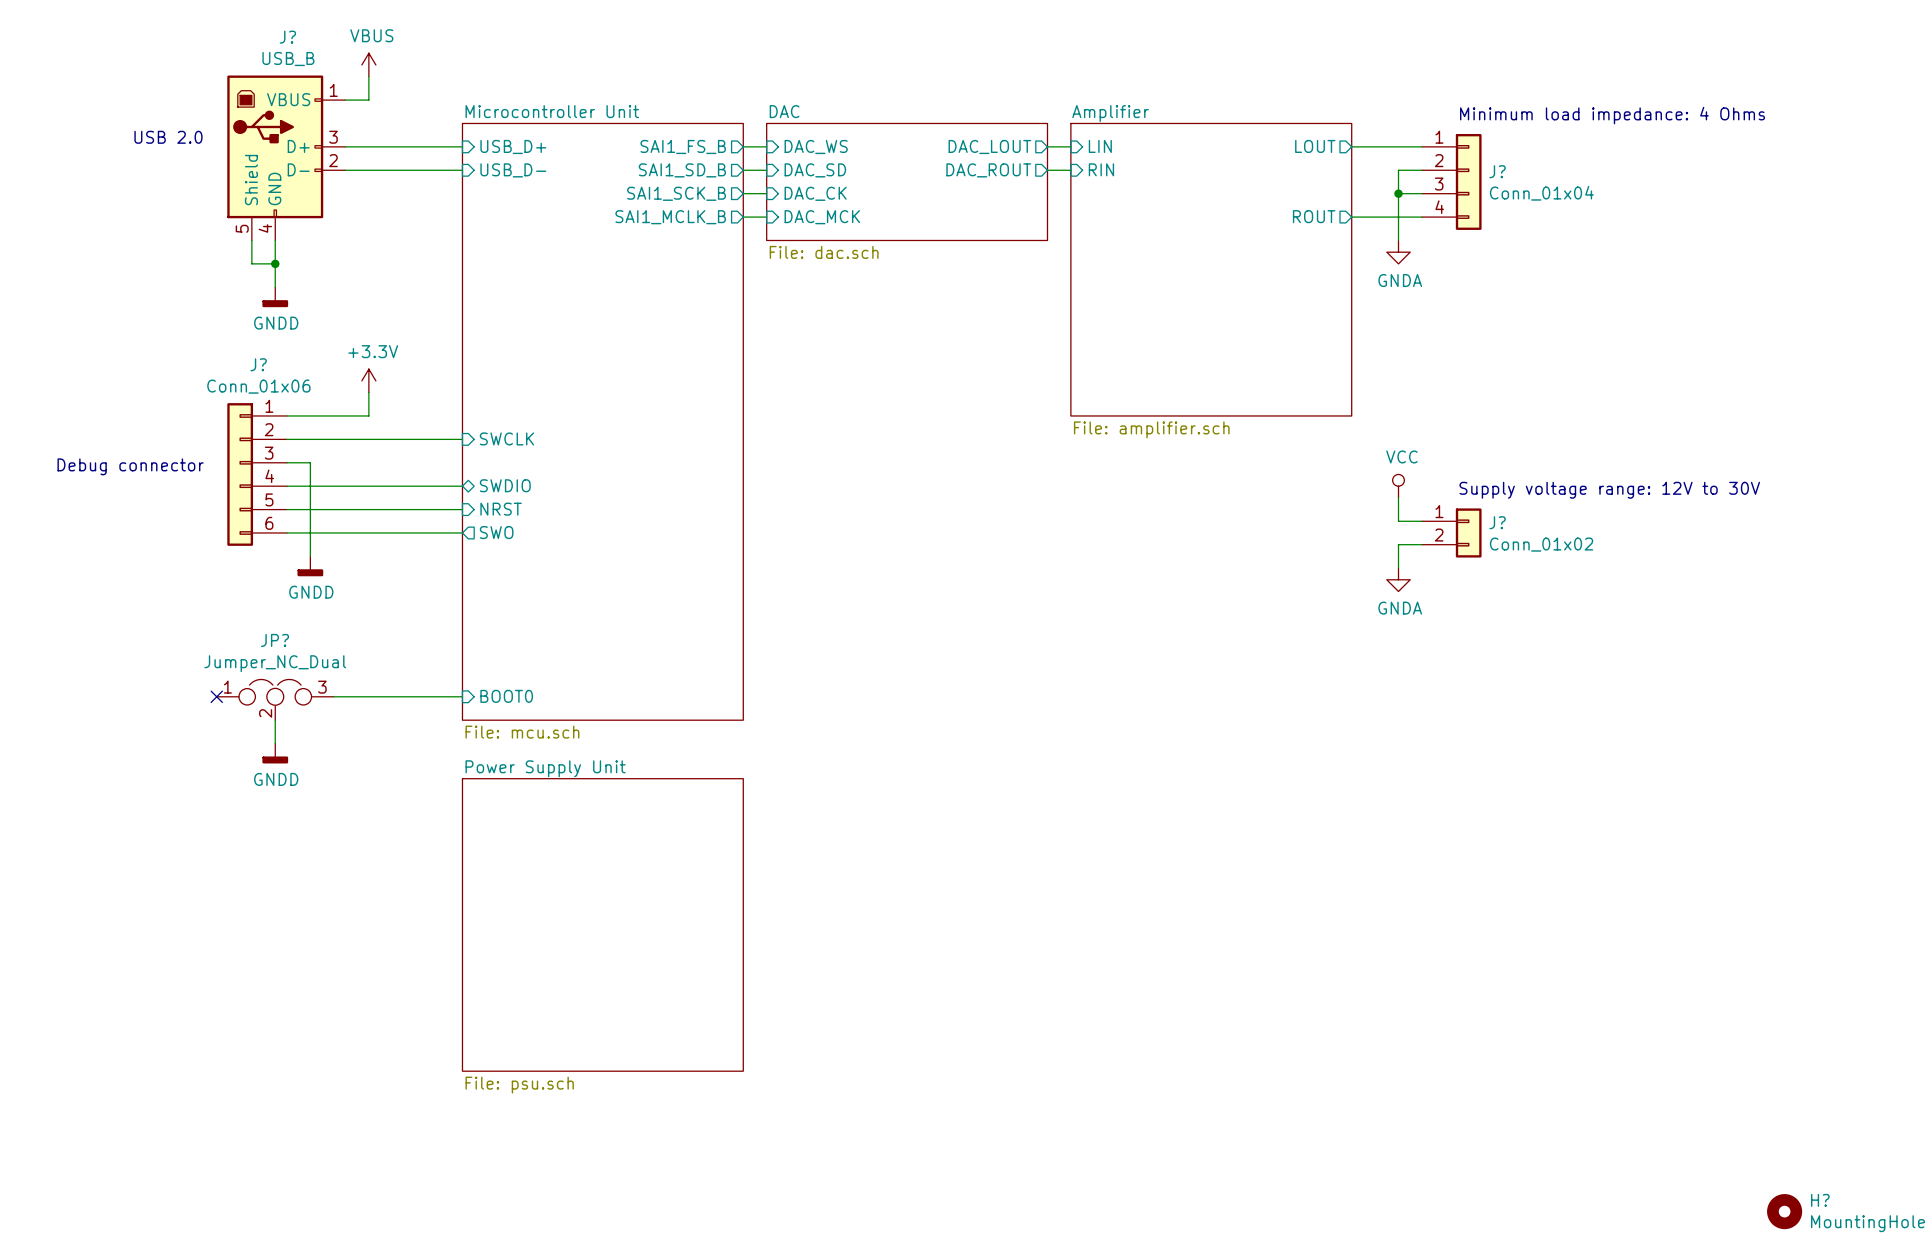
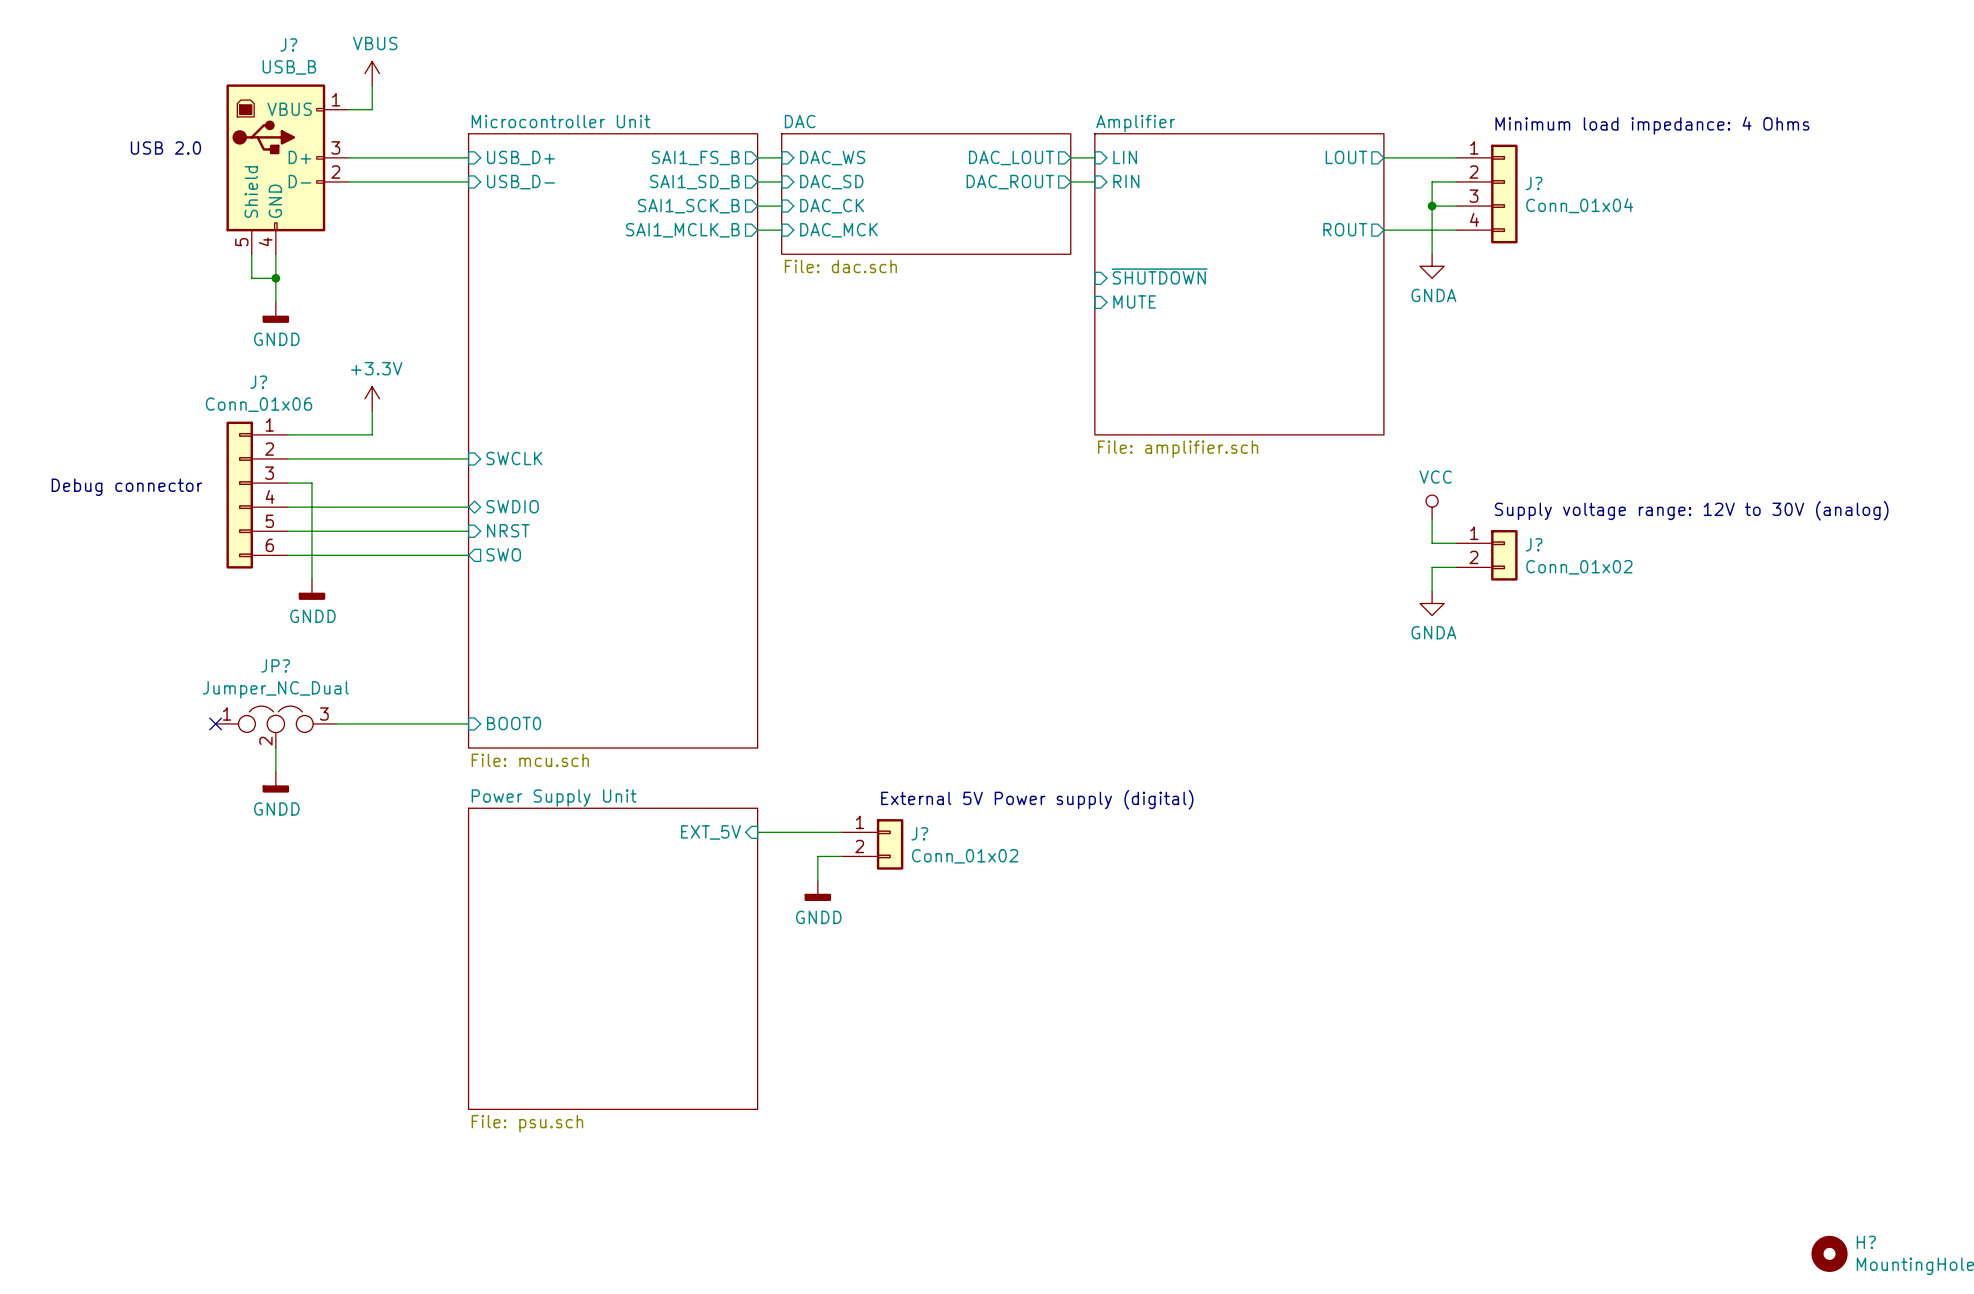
sheet pin: none -> ~{SHUTDOWN} (1159, 276)
sheet pin: none -> MUTE (1134, 301)
text: Supply voltage range: 12V to 30V (1609, 490) -> Supply voltage range: 12V to 30V (analog) (1691, 510)
text: none -> External 5V Power supply (digital) (1037, 799)
sheet pin: none -> EXT_5V (710, 832)
wire: none -> (757, 832) (841, 832)
J?: none -> Conn_01x02 (872, 844)
wire: none -> (841, 856) (817, 856) (817, 880)
power symbol: none -> GNDD (817, 890)

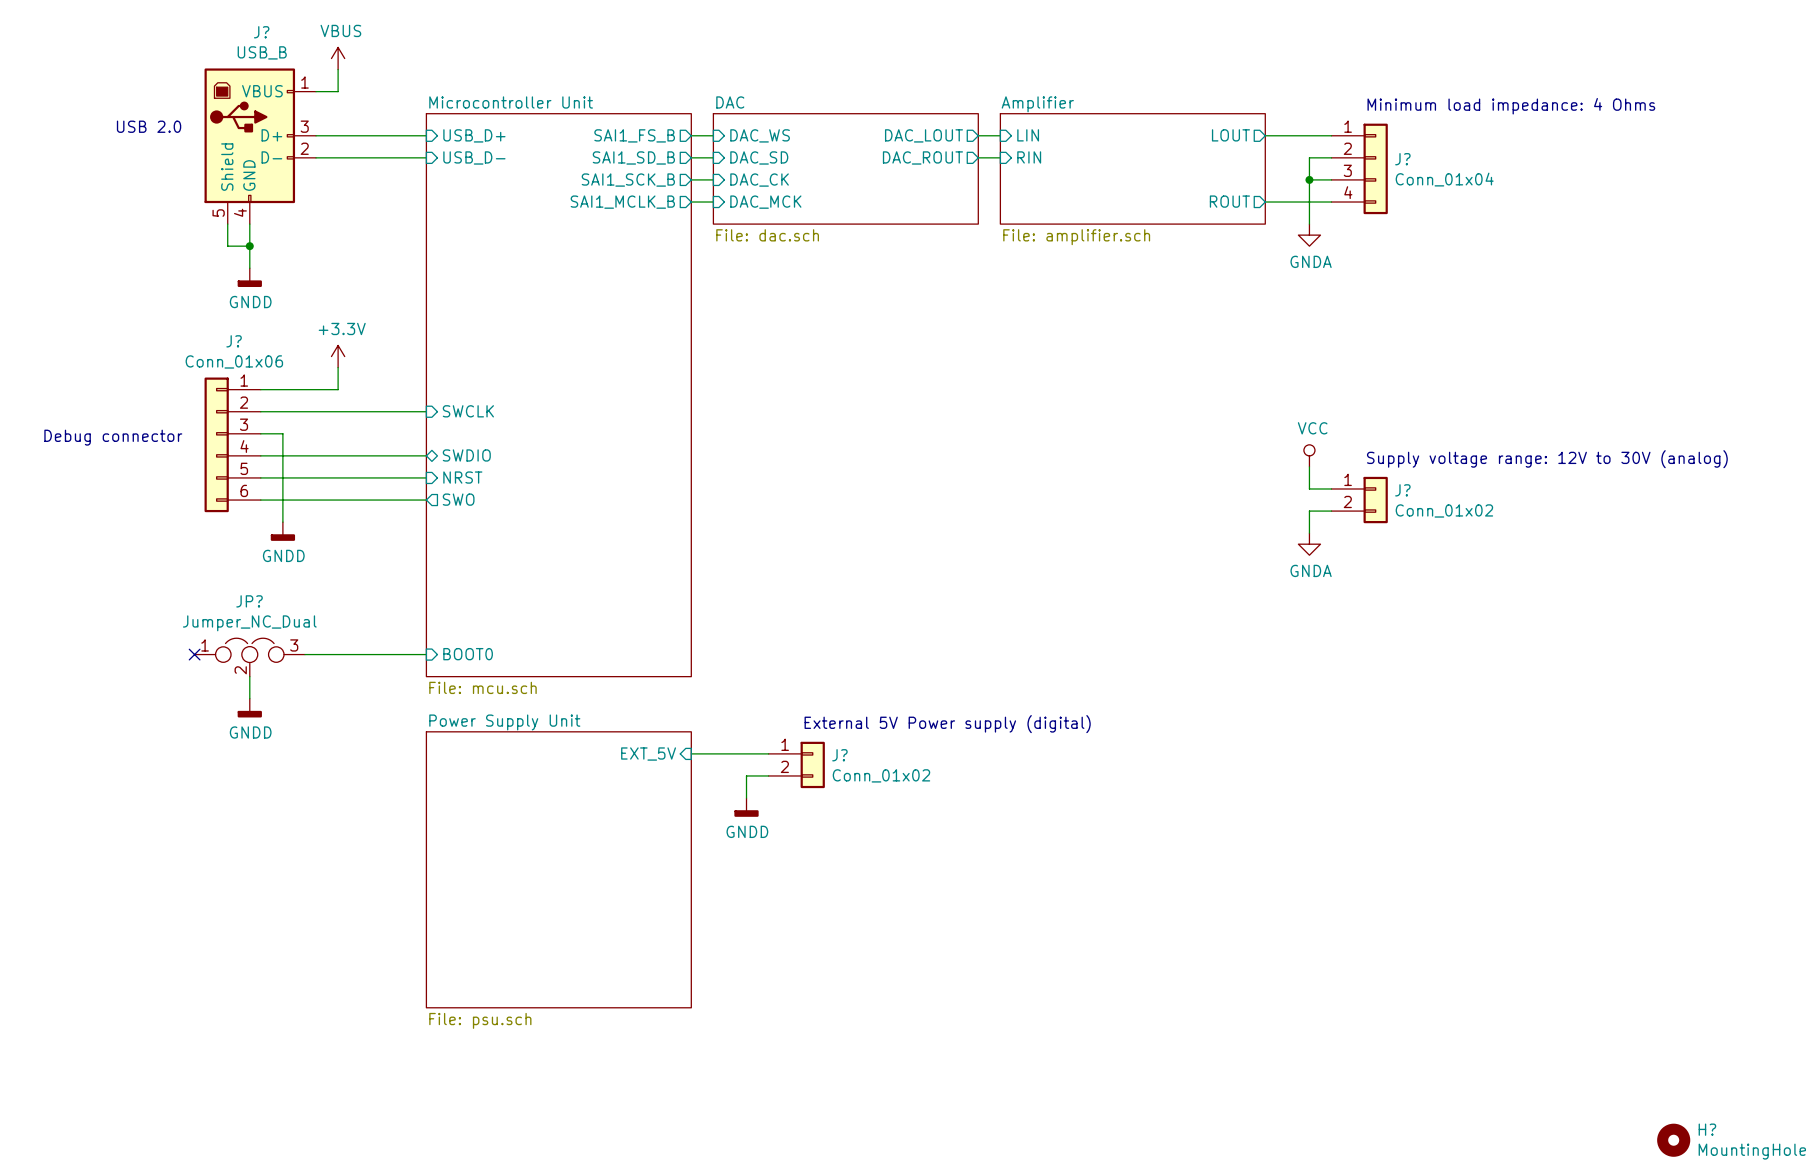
sheet Amplifier: none -> File: amplifier.sch (1132, 168)
sheet pin: ~{SHUTDOWN} (1159, 276) -> none
sheet Amplifier: File: amplifier.sch (1239, 284) -> none
sheet pin: MUTE (1134, 301) -> none

